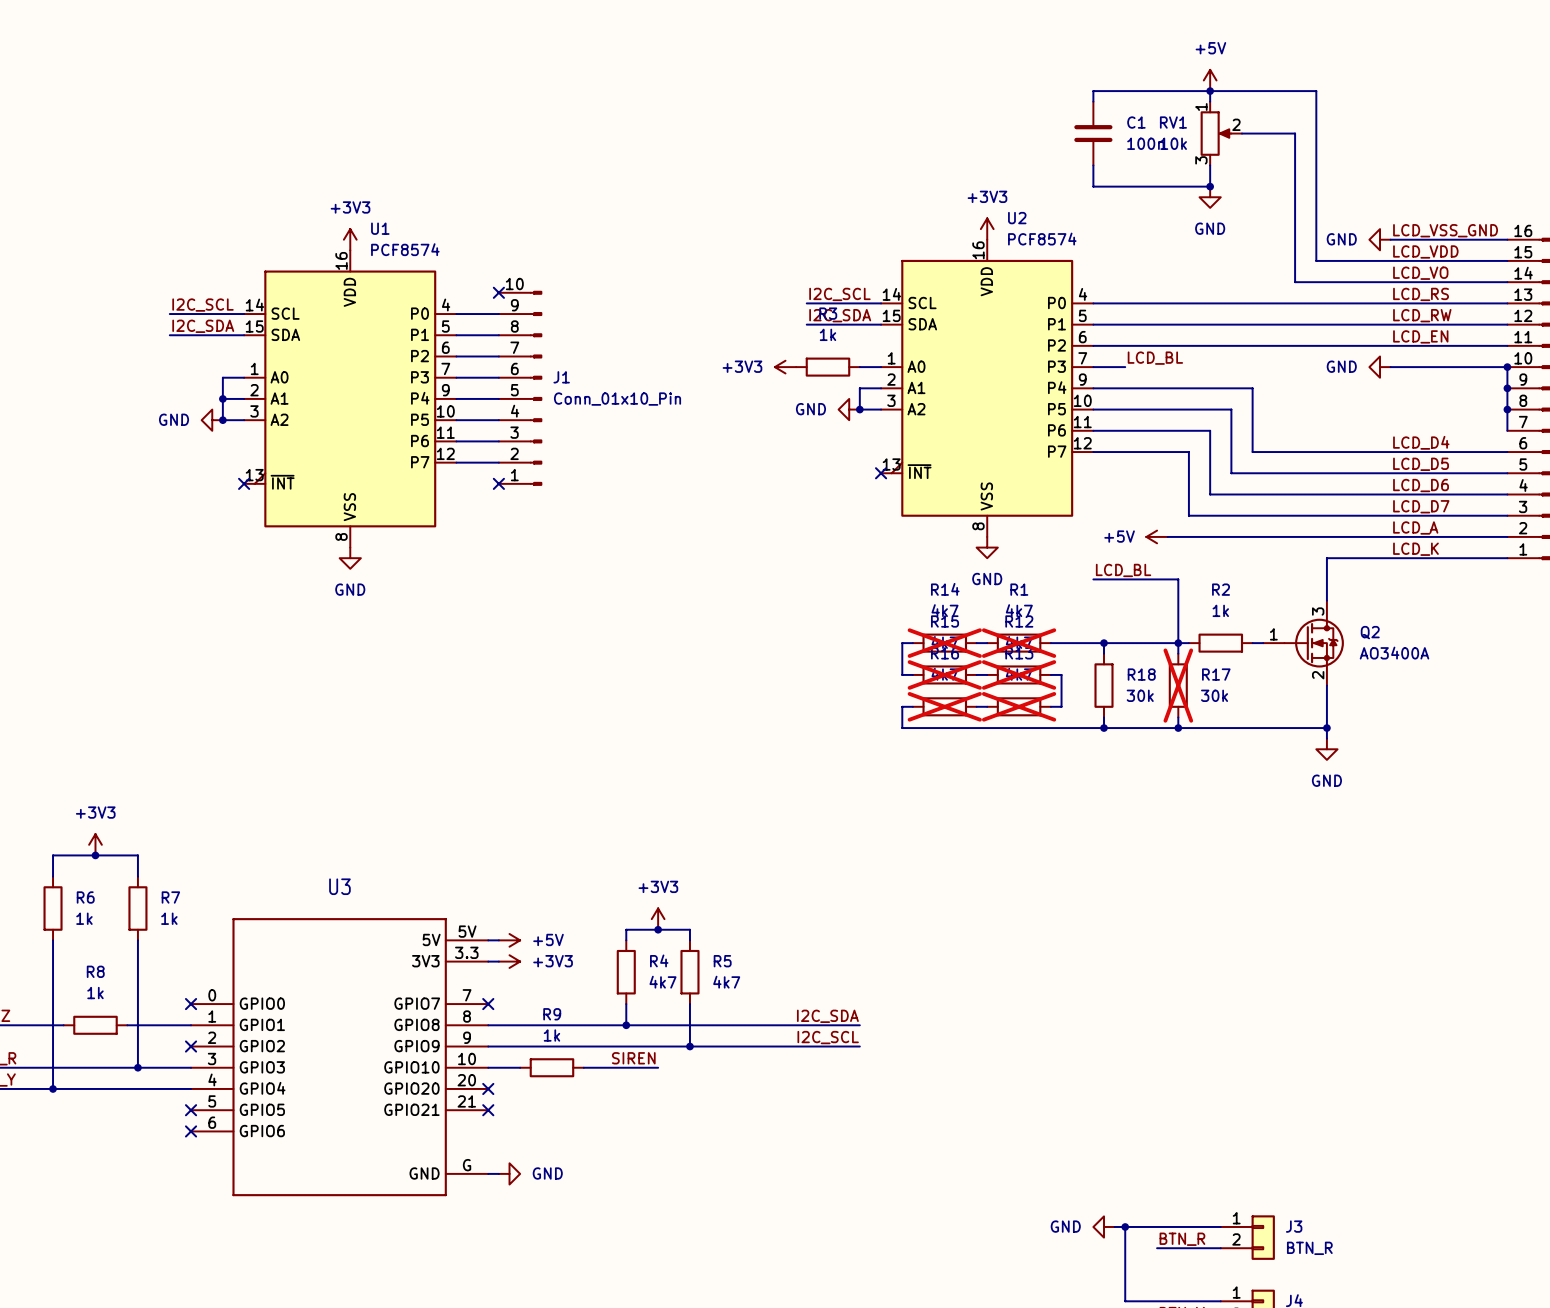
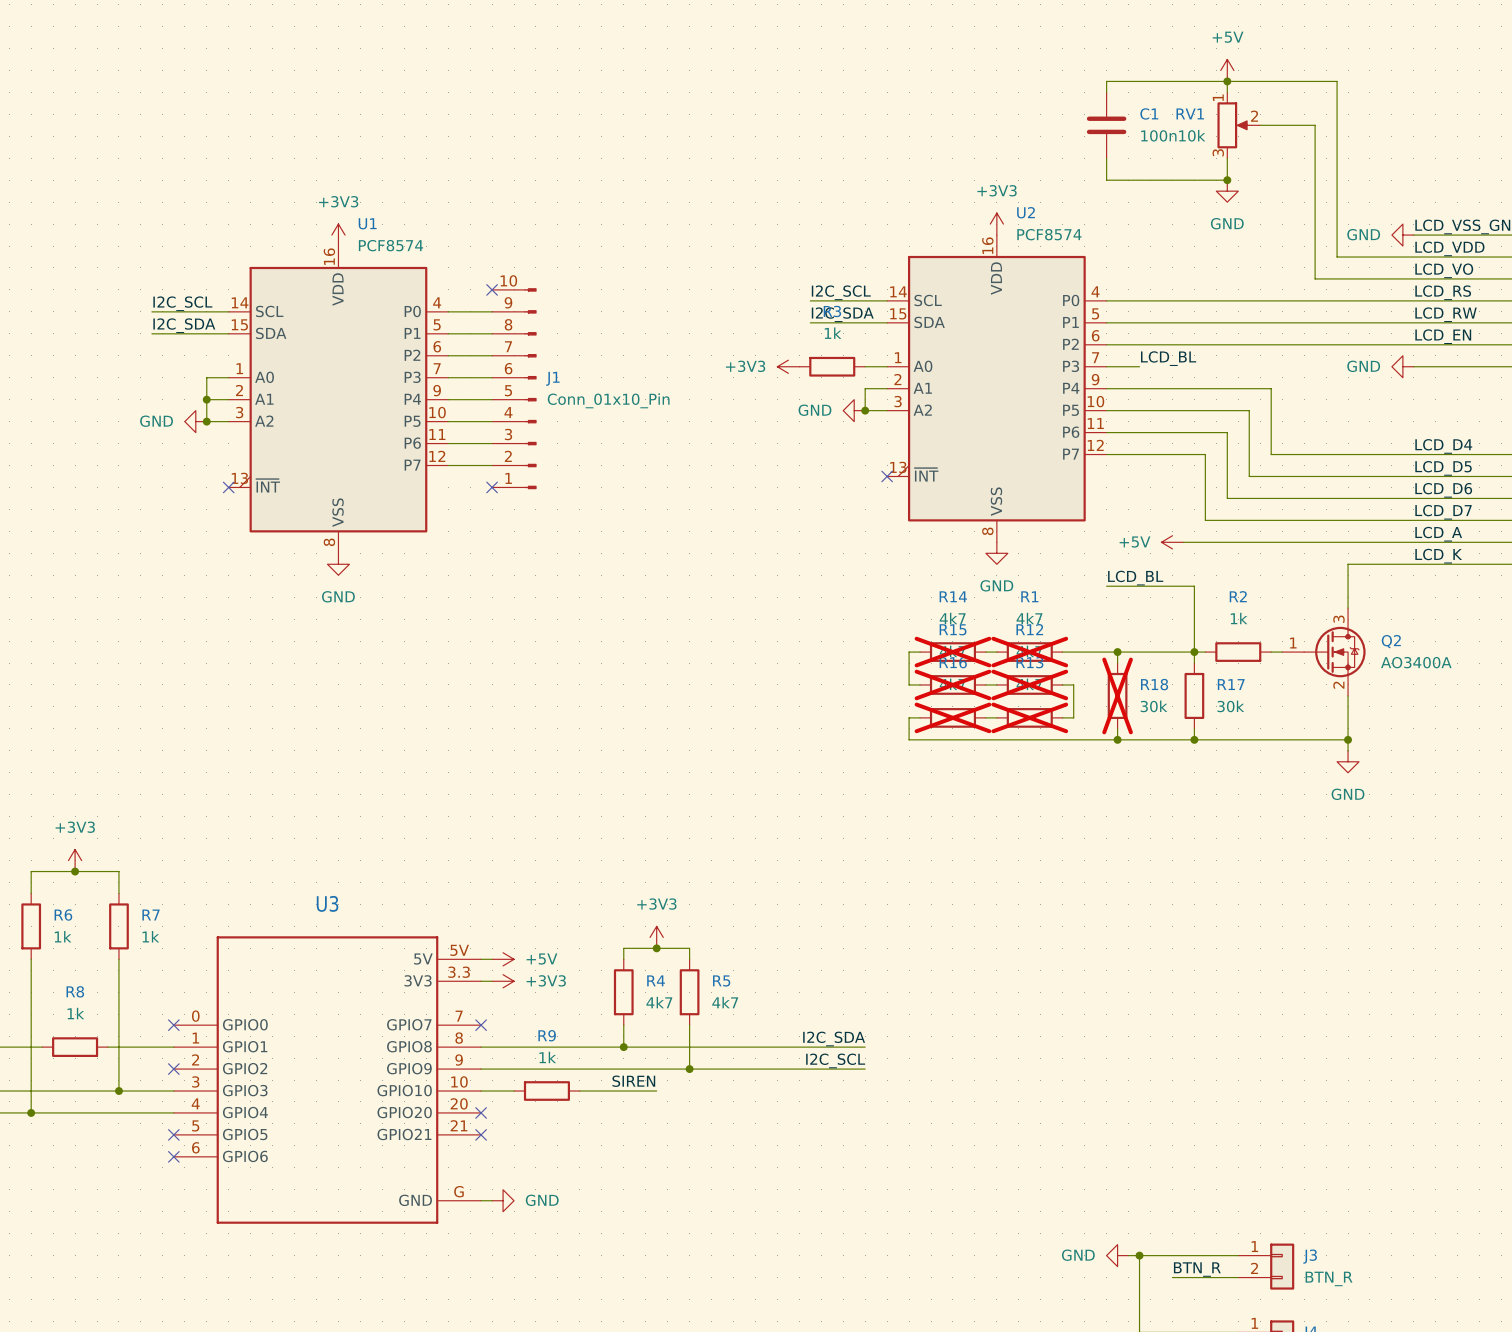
R18 do-not-place cross: none -> (1117, 695)
R17 do-not-place cross: (1178, 685) -> none

